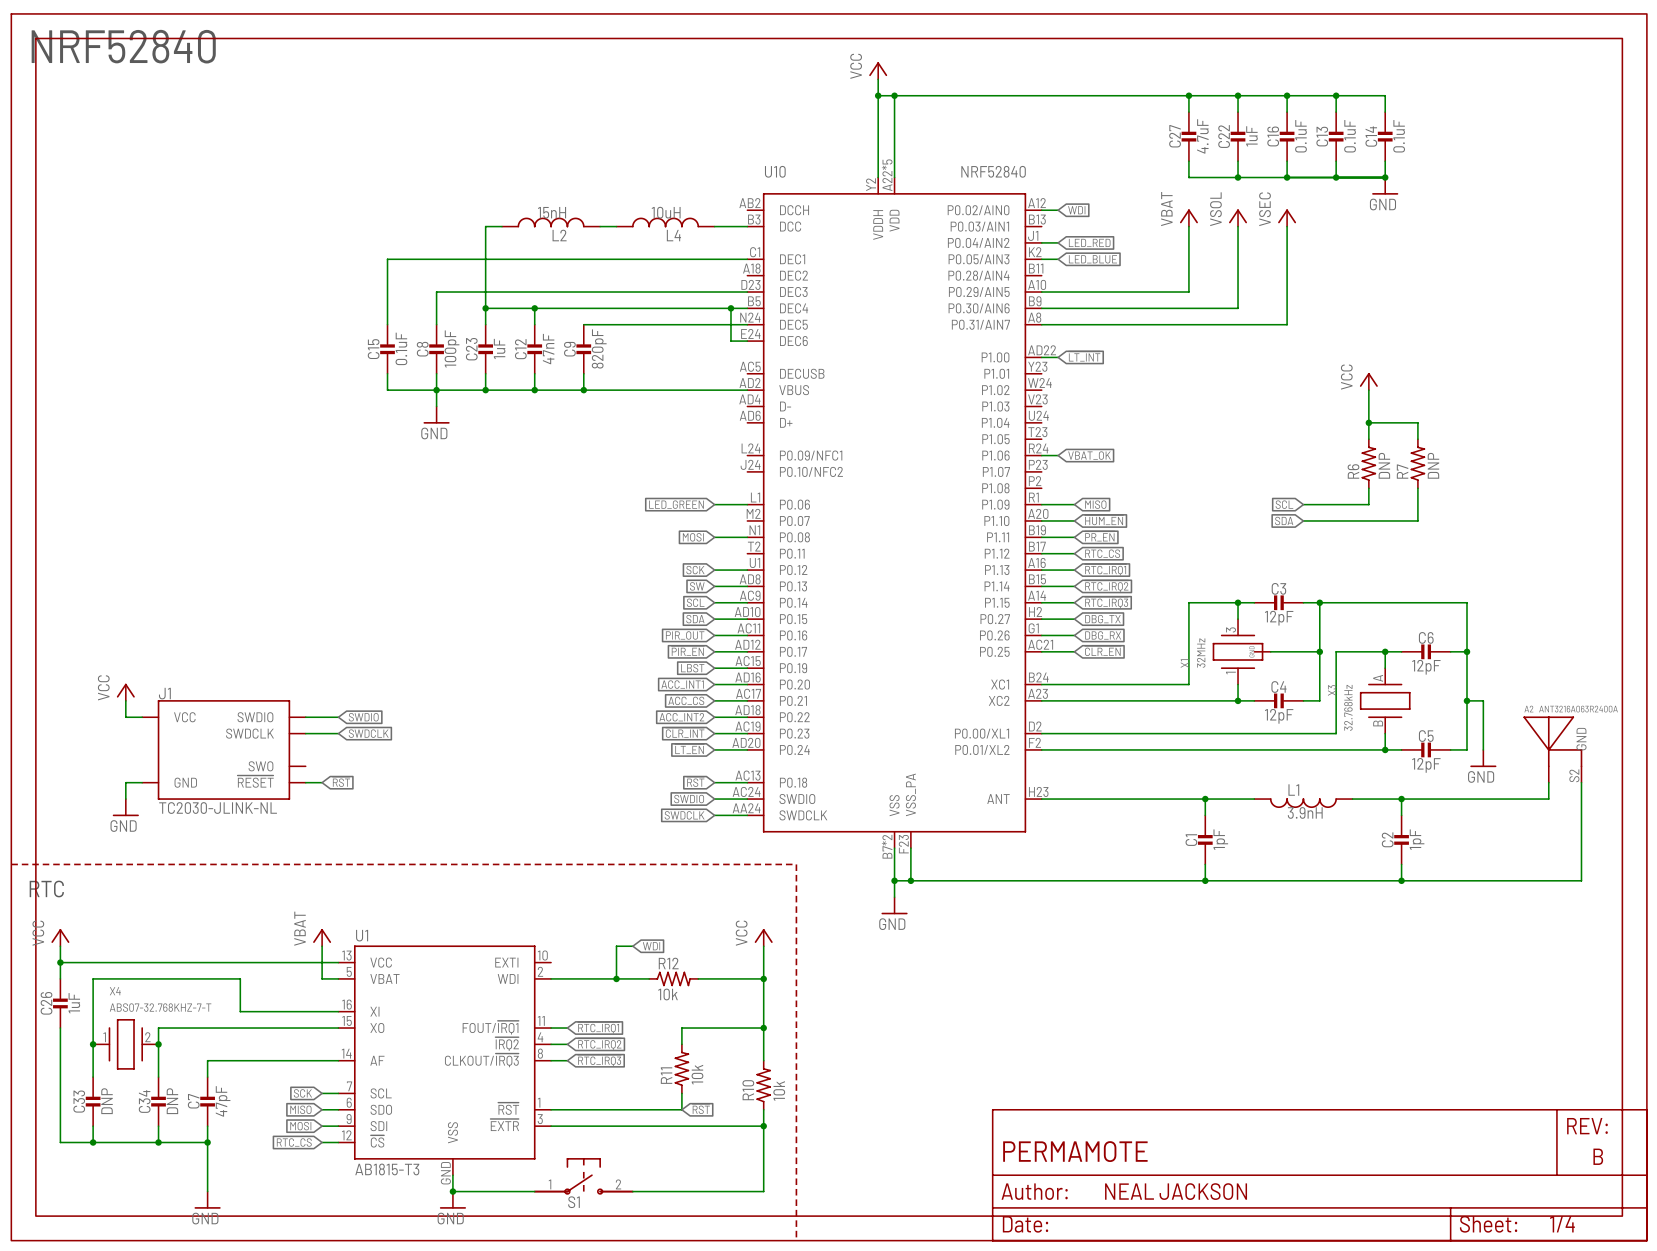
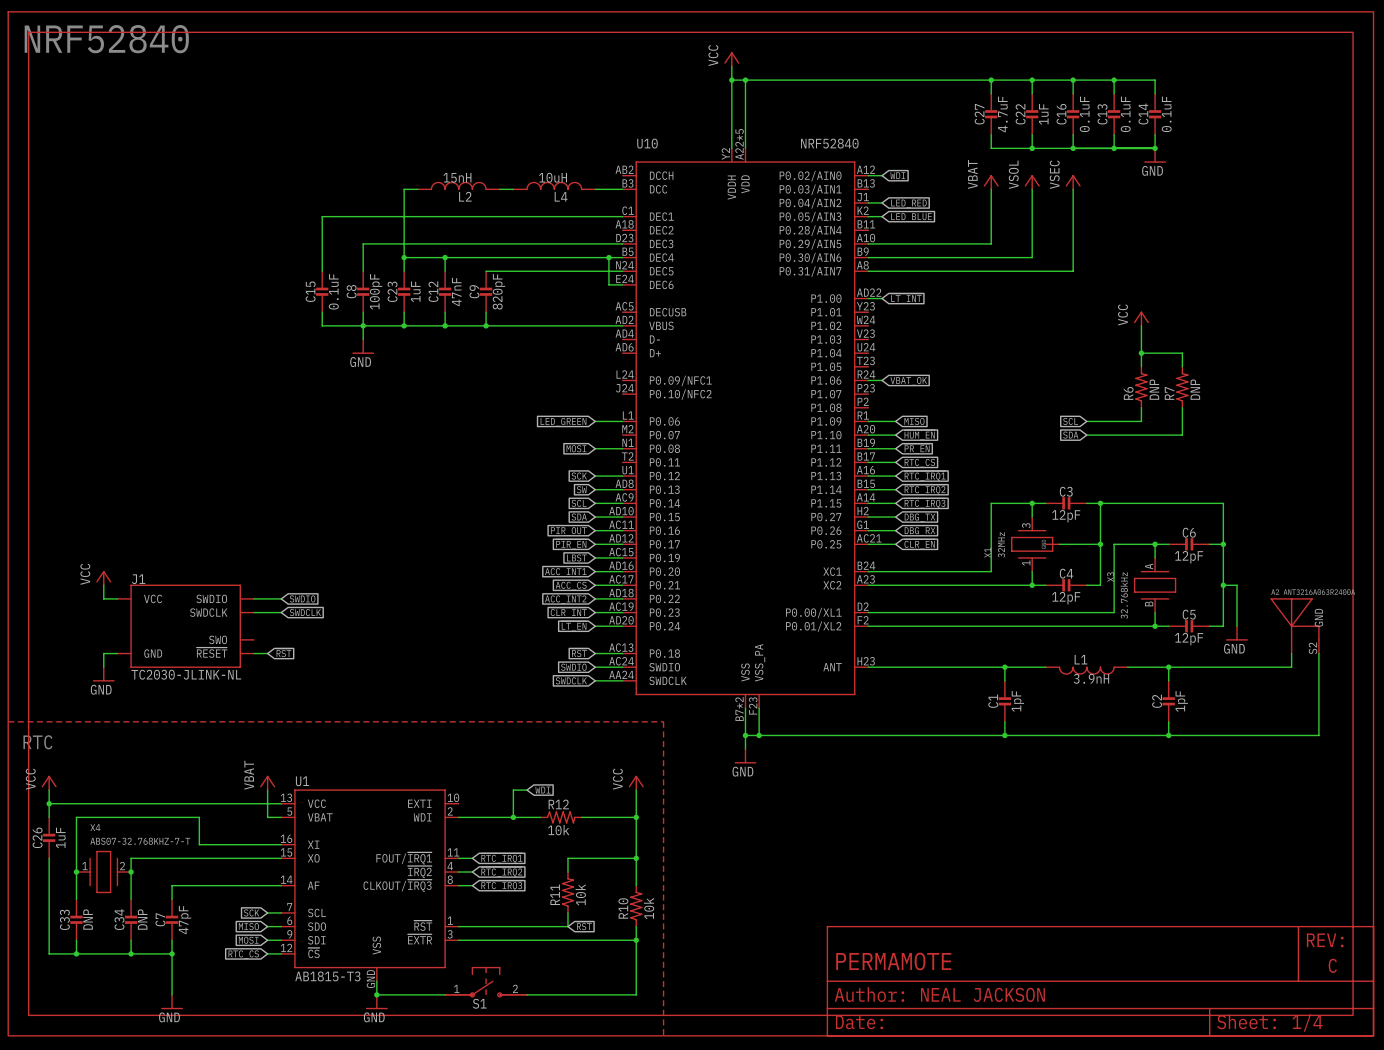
part text: B (1598, 1156) -> C (1332, 965)

